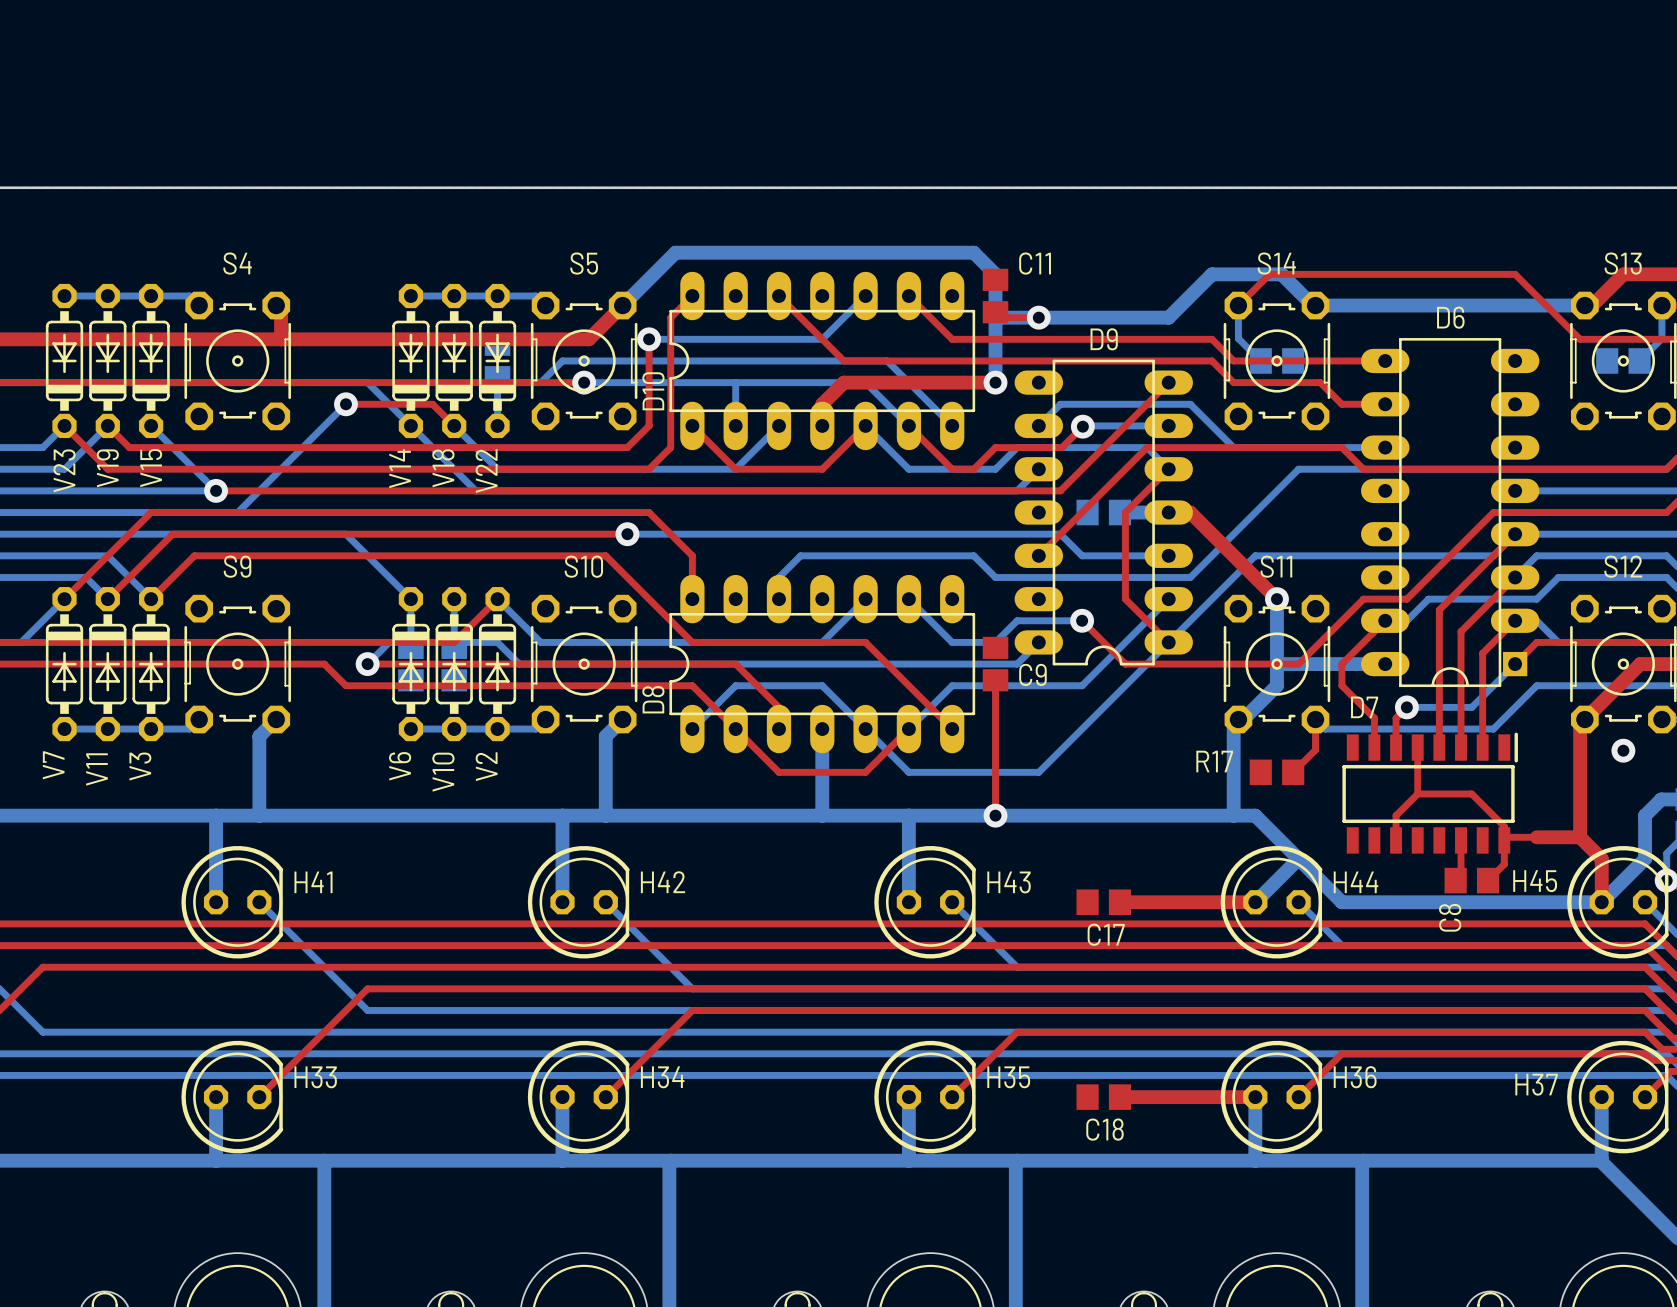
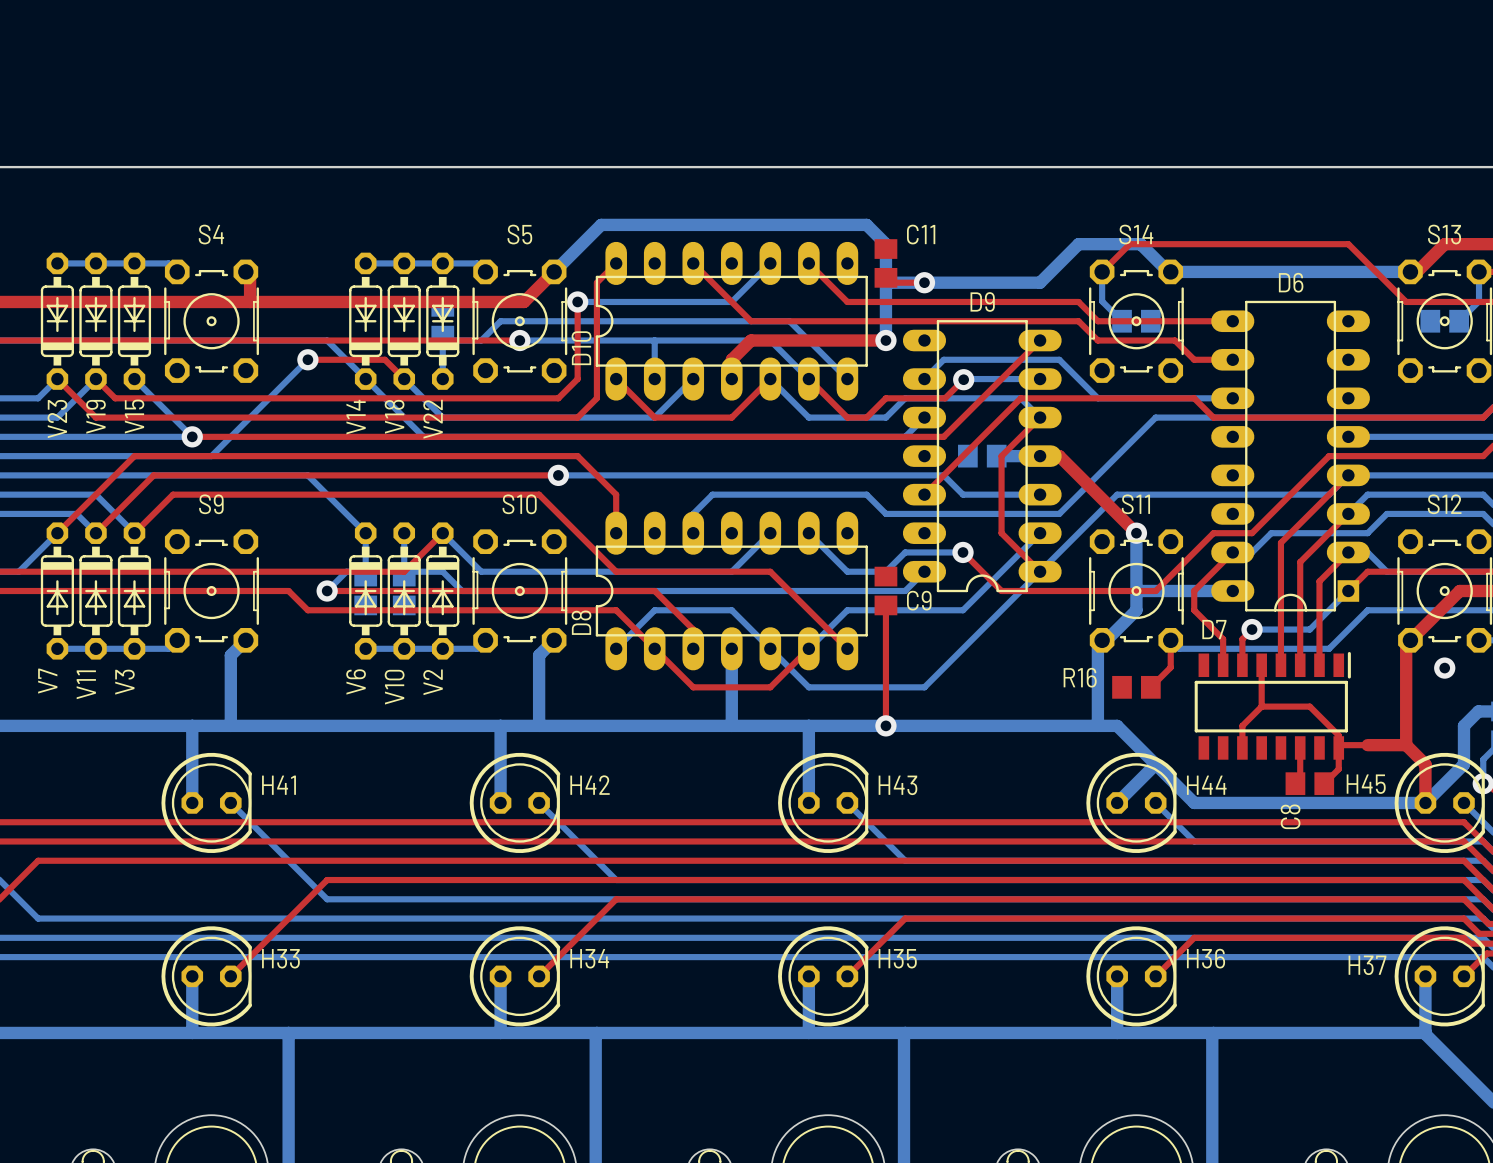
R17 name: R17 (1214, 761) -> R16 (1080, 677)
C17: (1103, 902) -> none
top track: (1119, 902) (1255, 902) -> none
C18: (1103, 1097) -> none
top track: (1119, 1097) (1255, 1097) -> none

